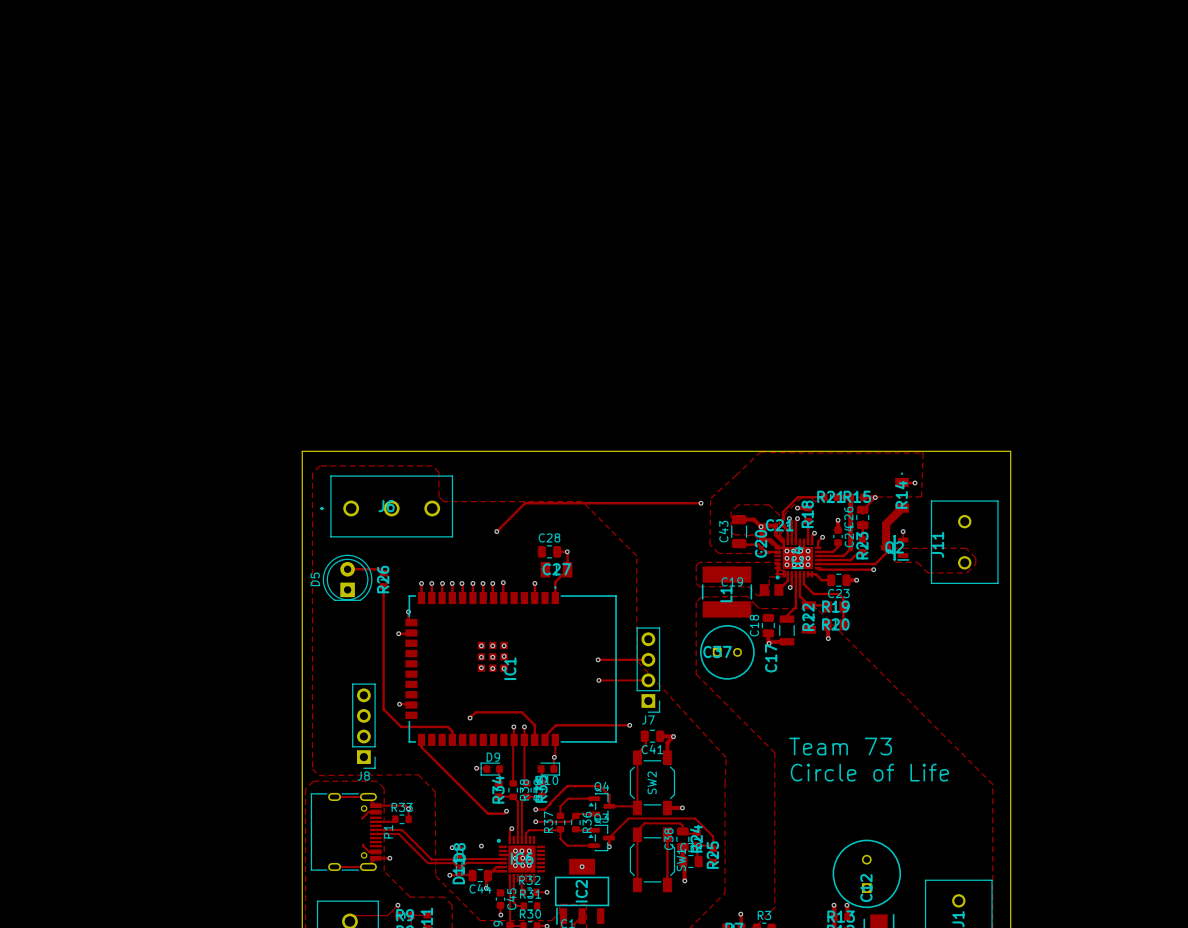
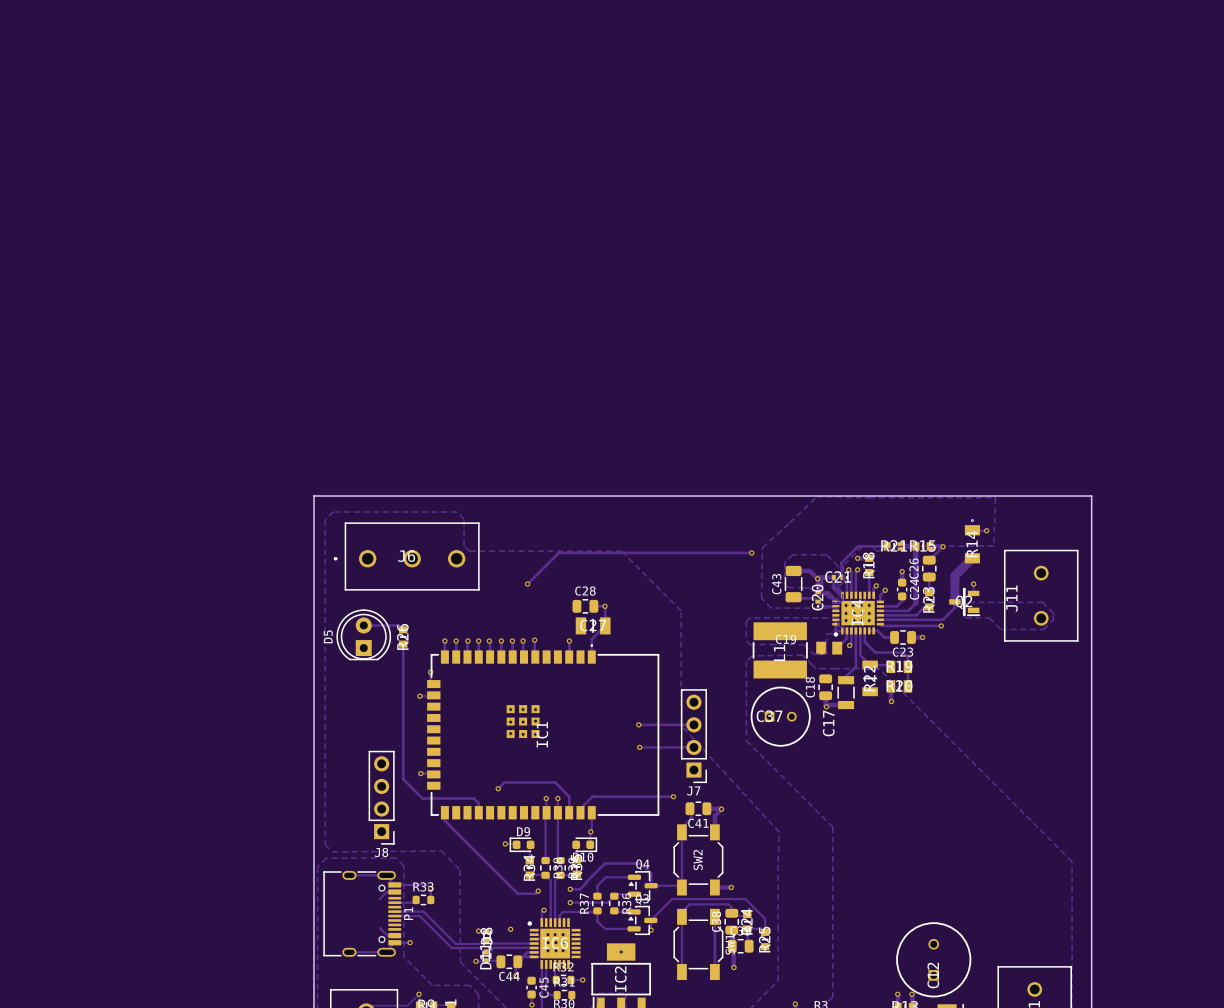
text: Team 73 (840, 746) -> none
text: Circle of Life (869, 772) -> none

